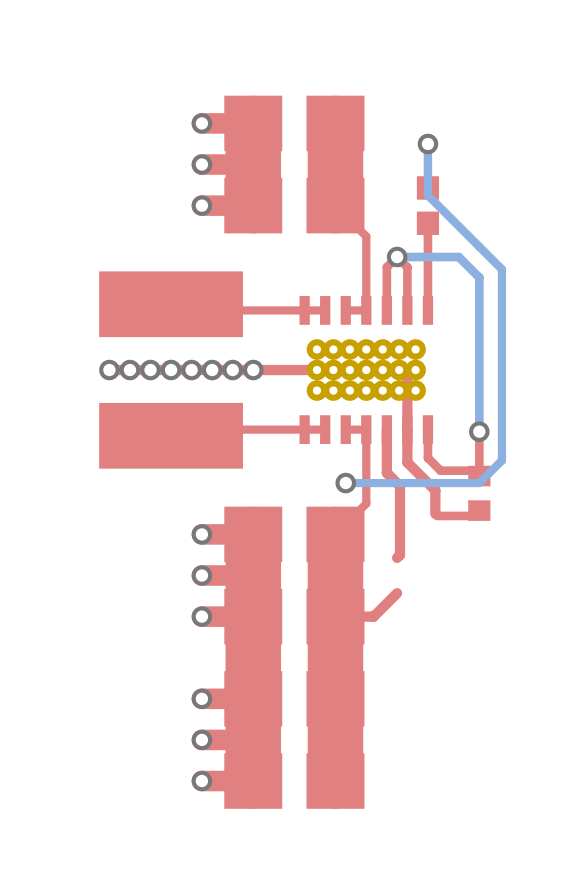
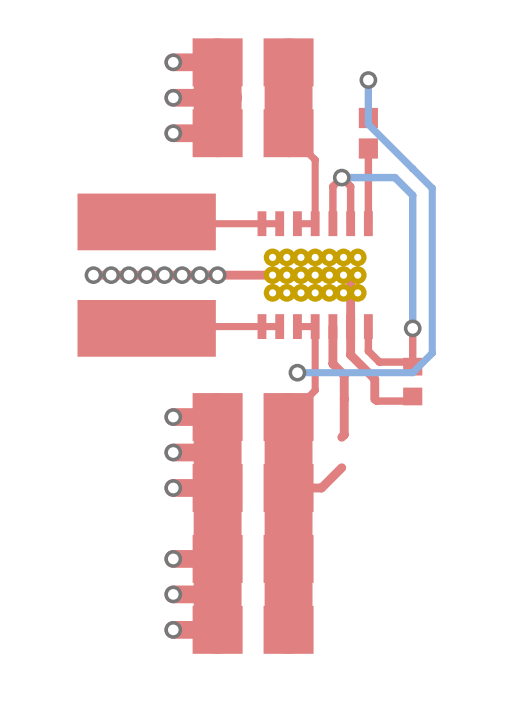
part footprint: [99, 271, 244, 469] -> [77, 193, 216, 357]

